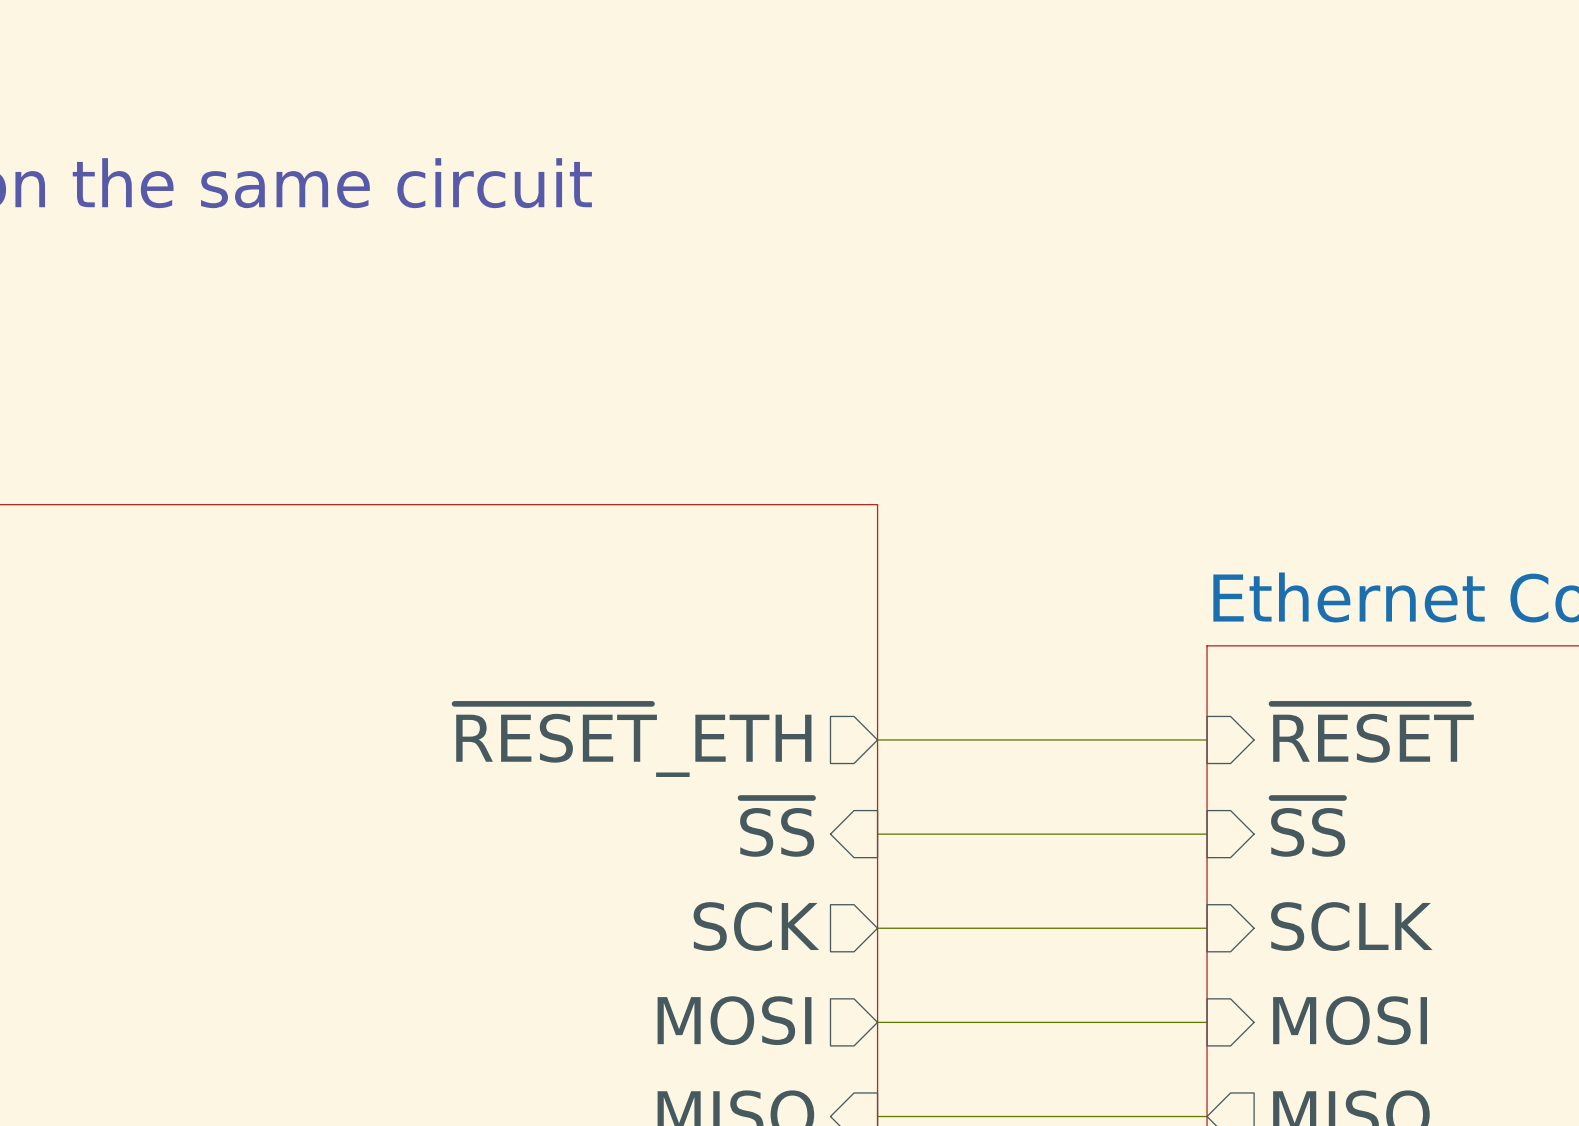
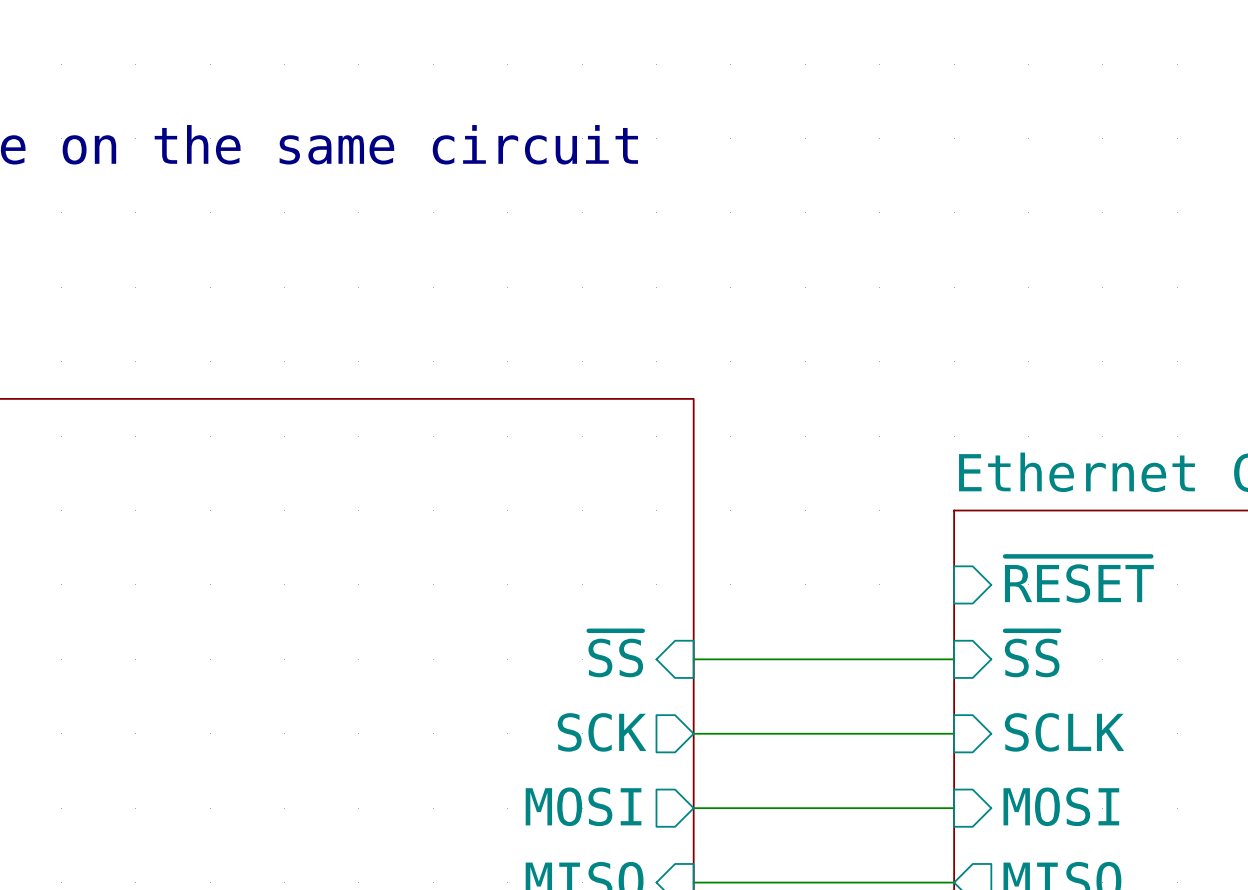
wire: (877, 739) (1207, 739) -> none
sheet pin: ~{RESET}_ETH (633, 740) -> none

